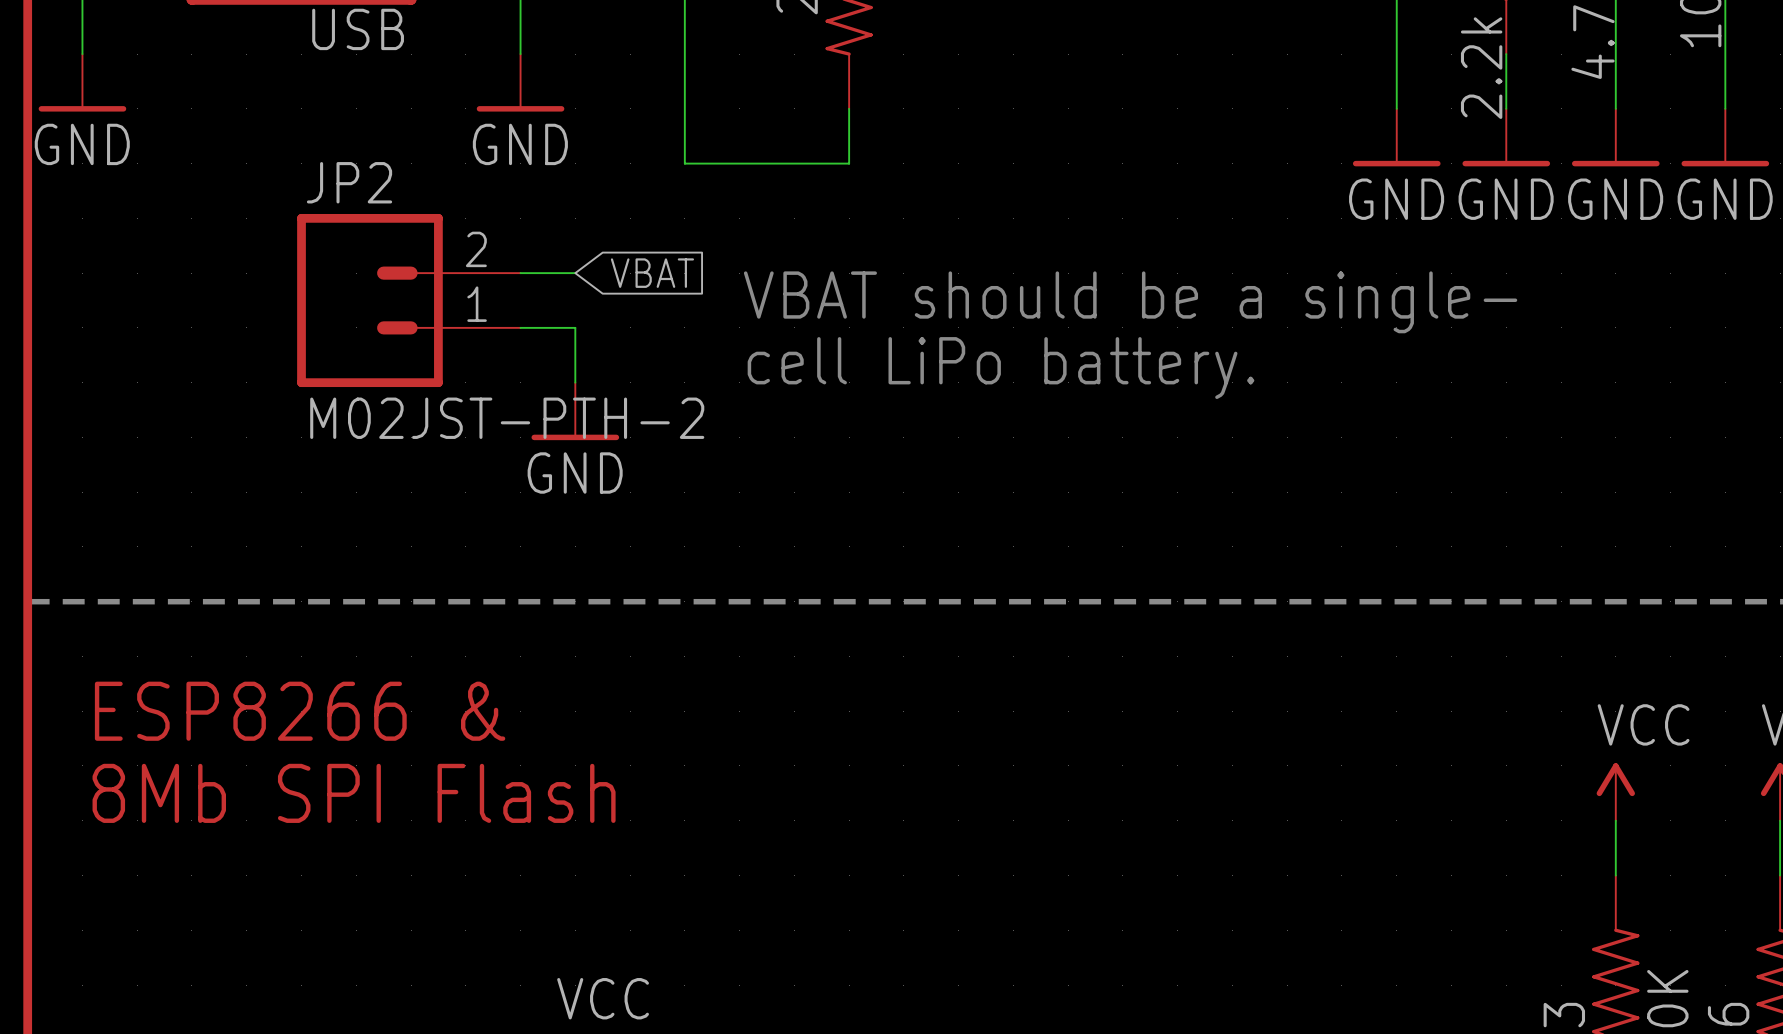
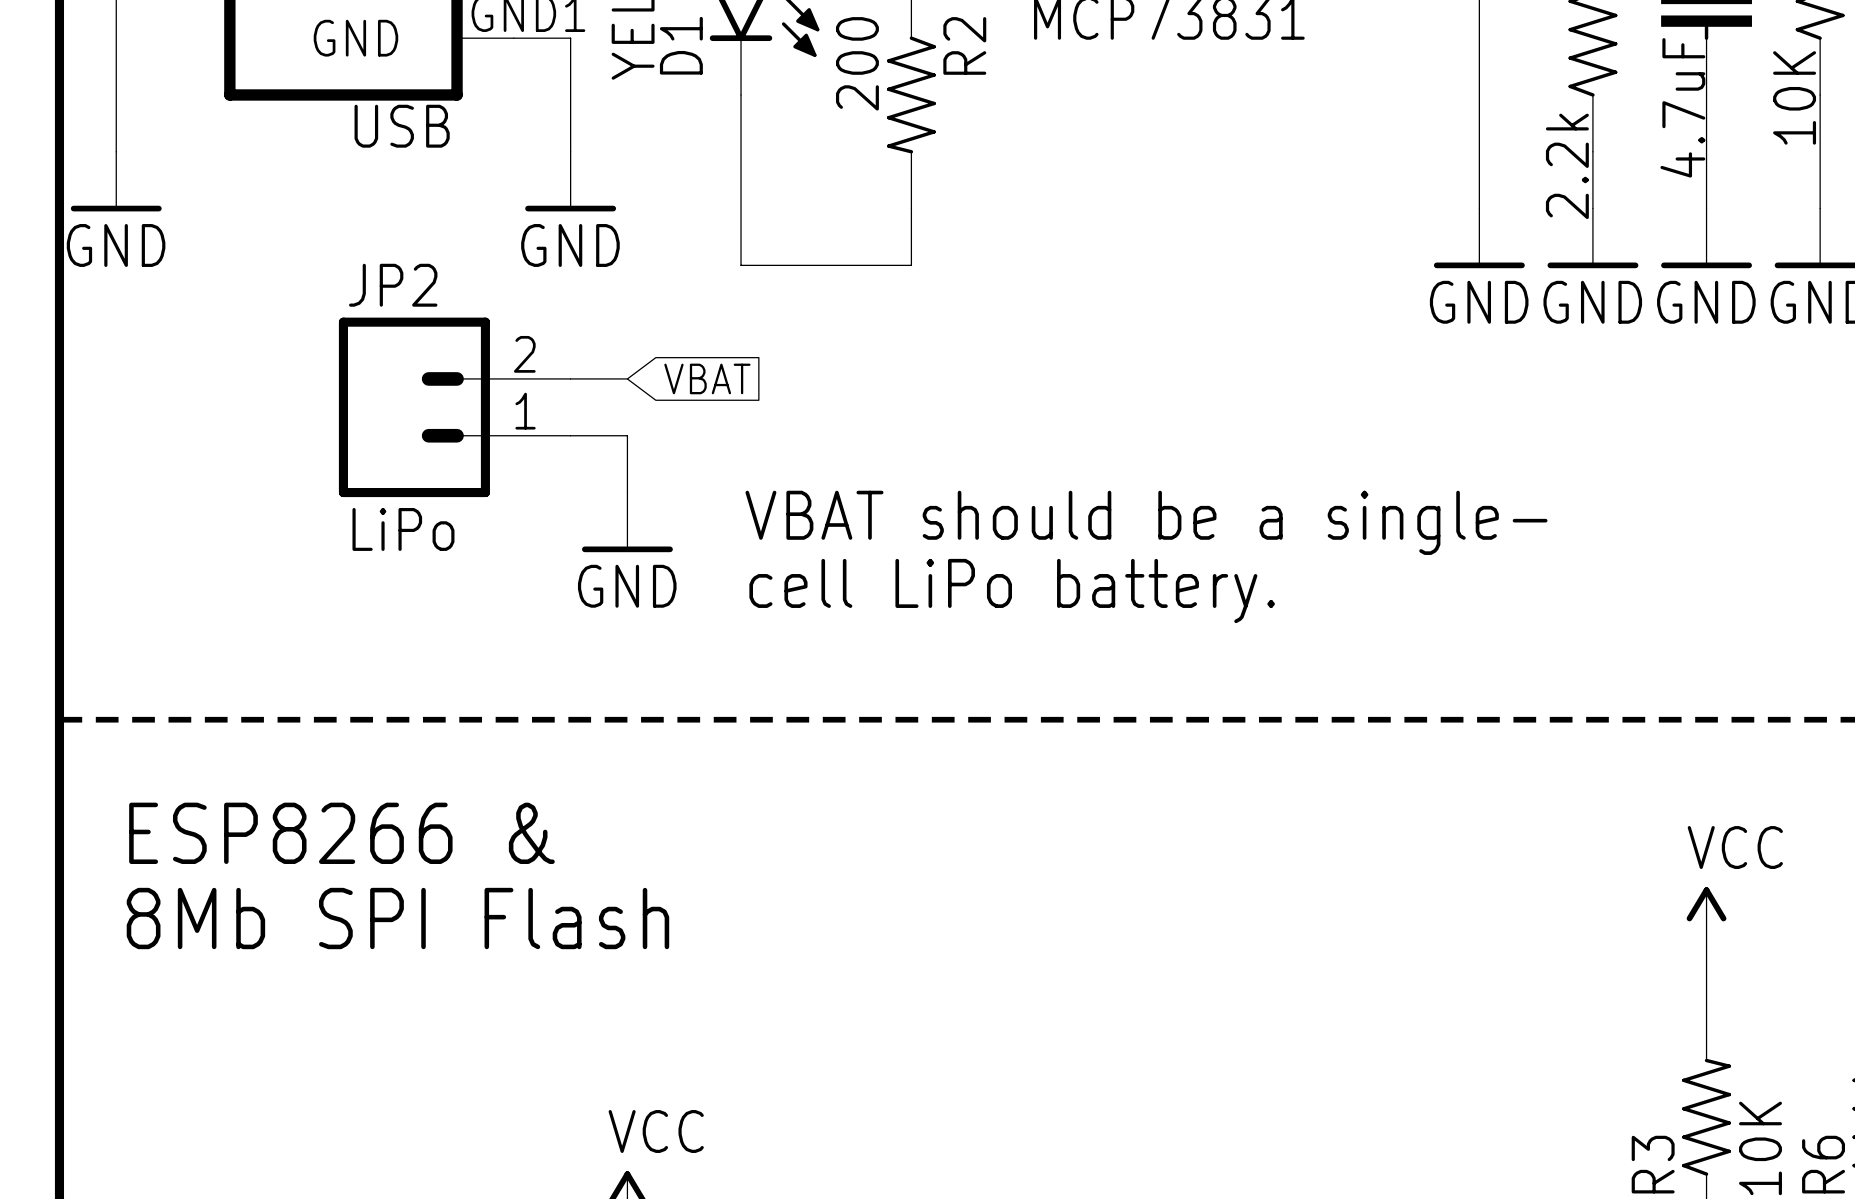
text position: VBAT should be a single- (1130, 302) -> VBAT should be a single- (1146, 522)
text position: cell LiPo battery. (1001, 368) -> cell LiPo battery. (1012, 590)
JP2 value: M02JST-PTH-2 (507, 418) -> LiPo (403, 529)

